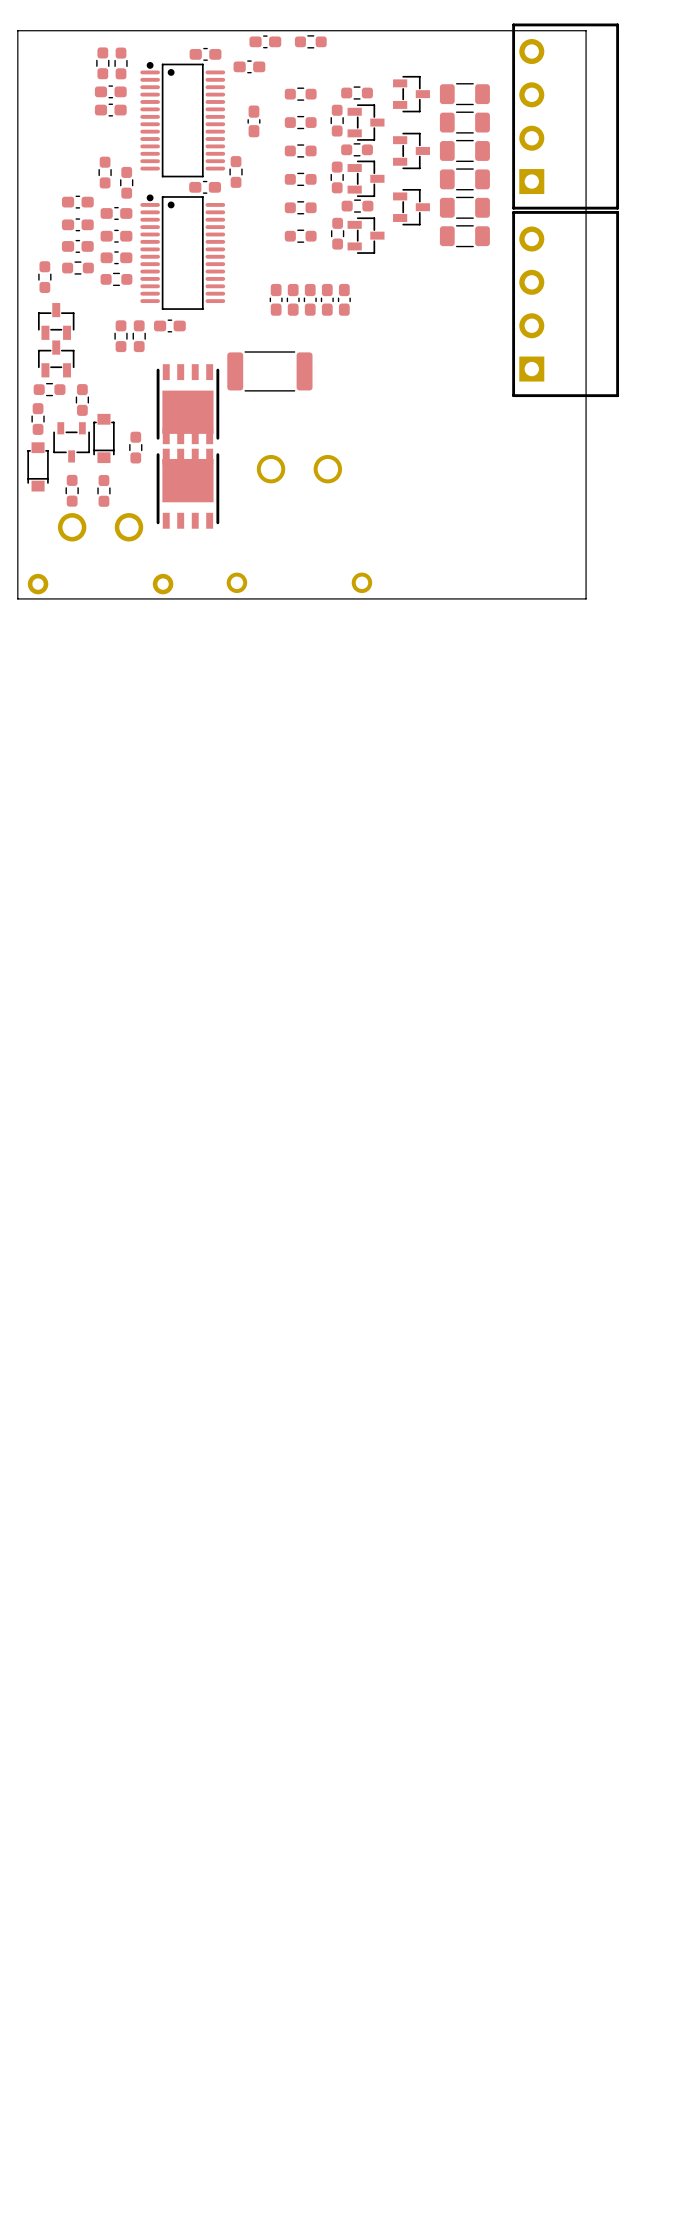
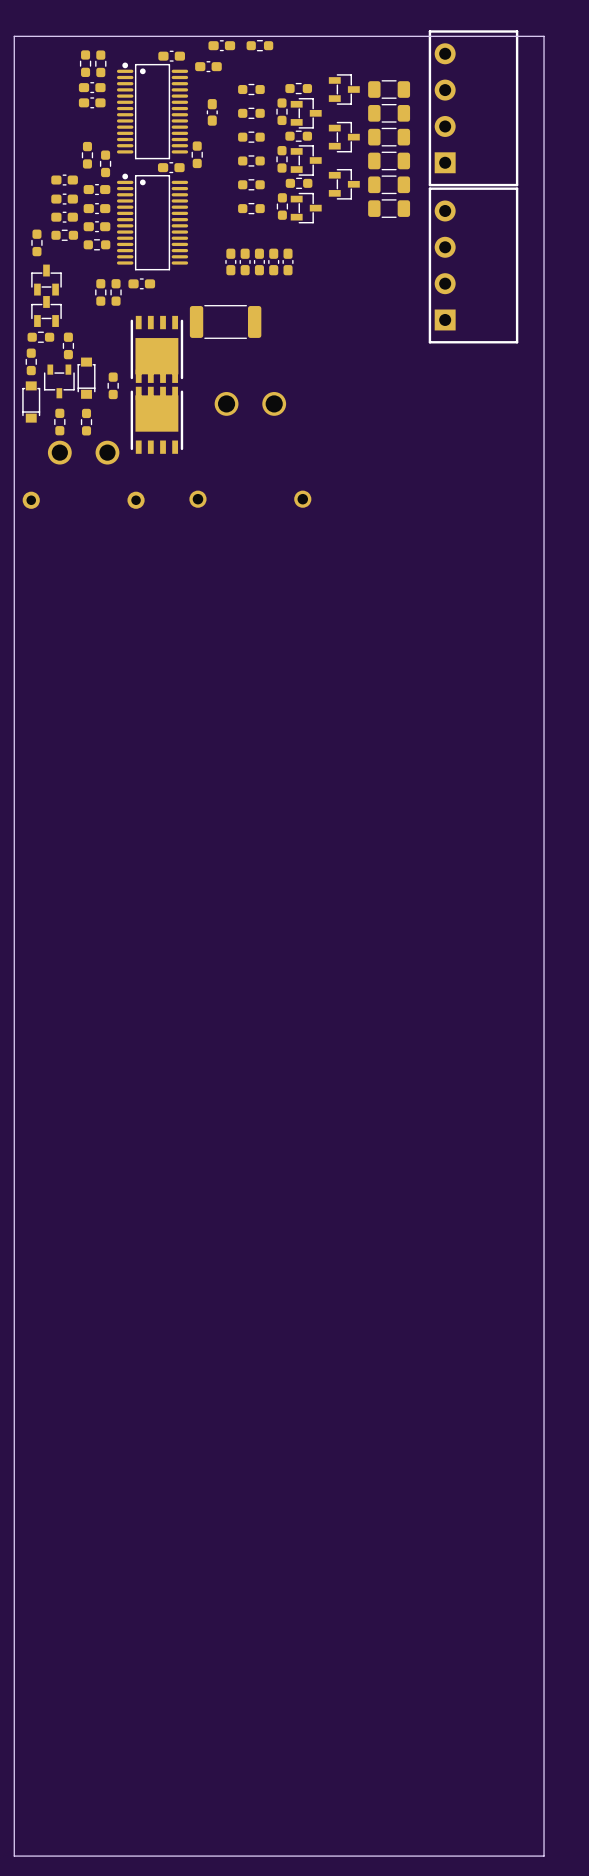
board edge: (586, 30) (586, 598) (17, 598) -> (490, 36) (544, 36) (544, 1856) (14, 1856) (14, 512)

